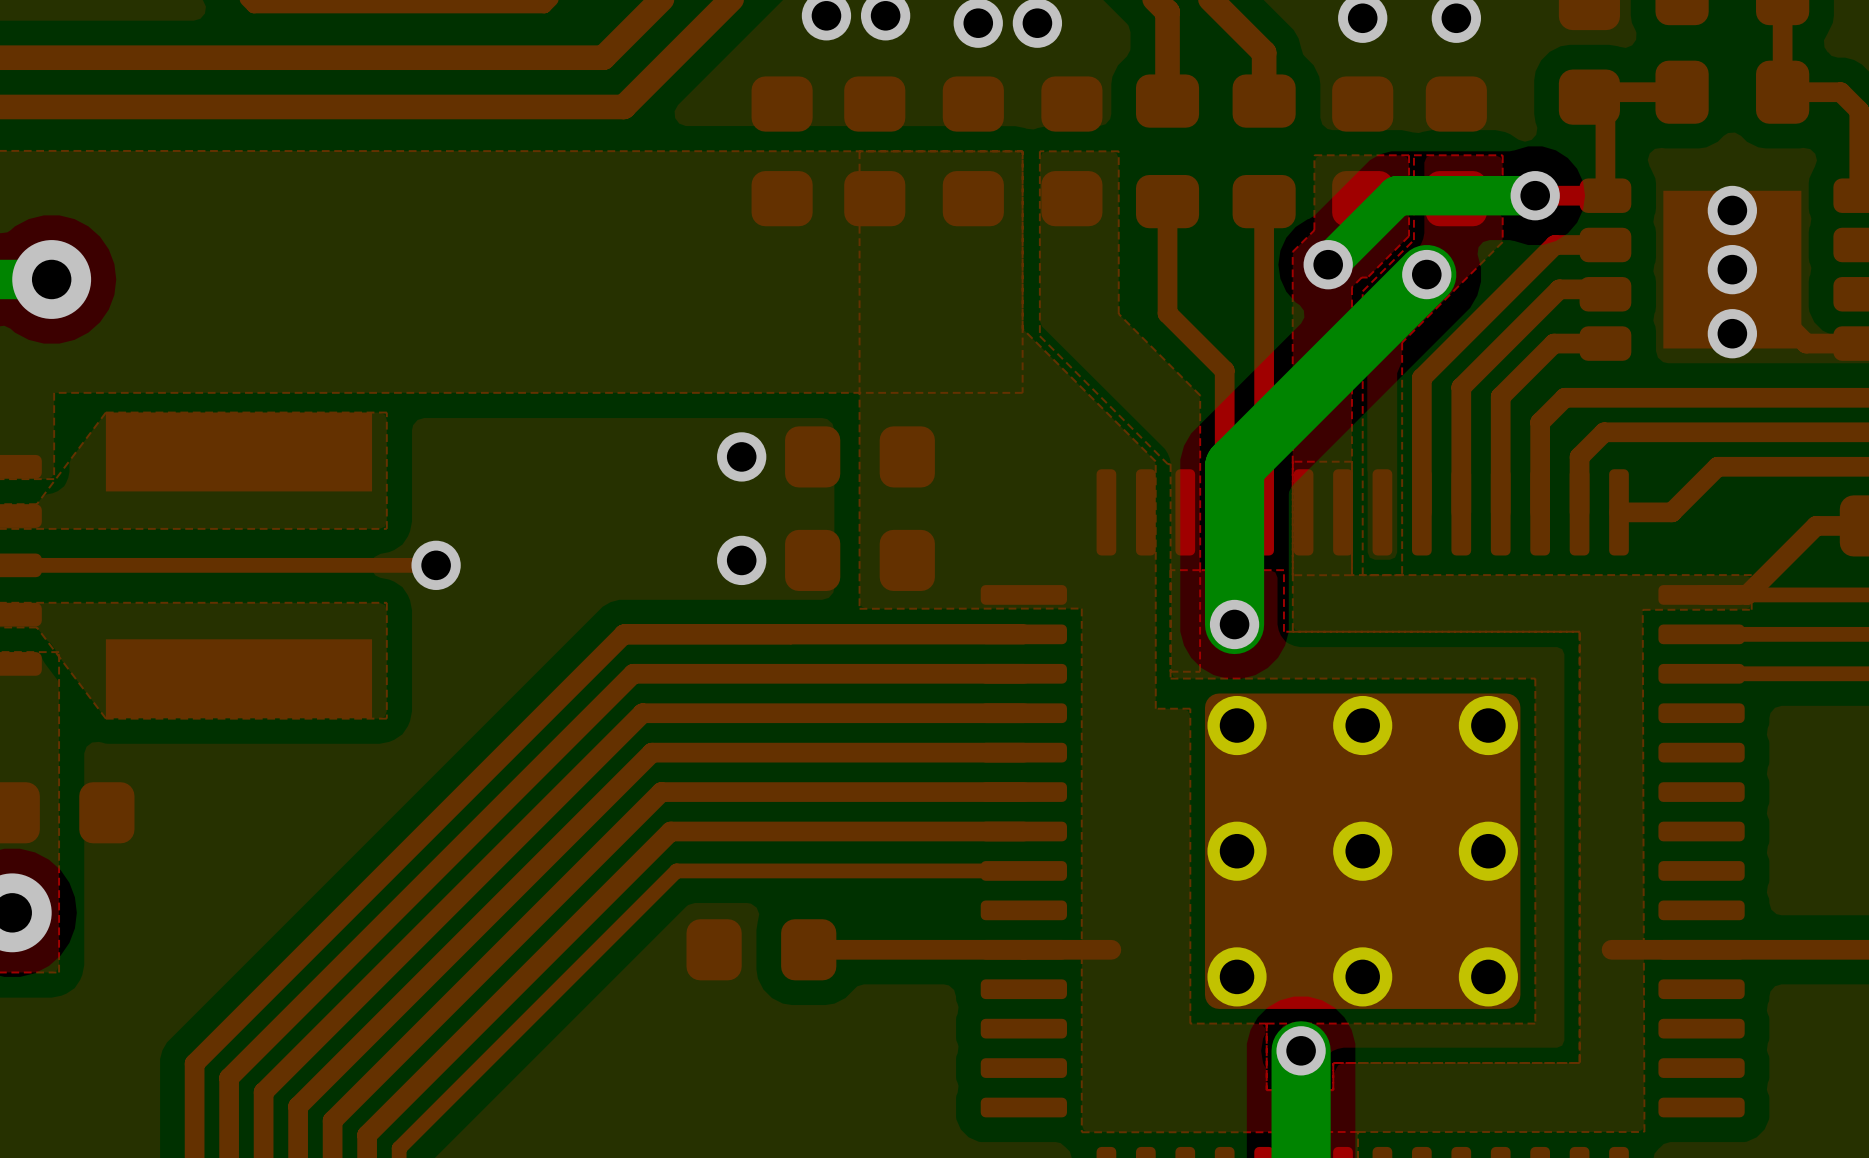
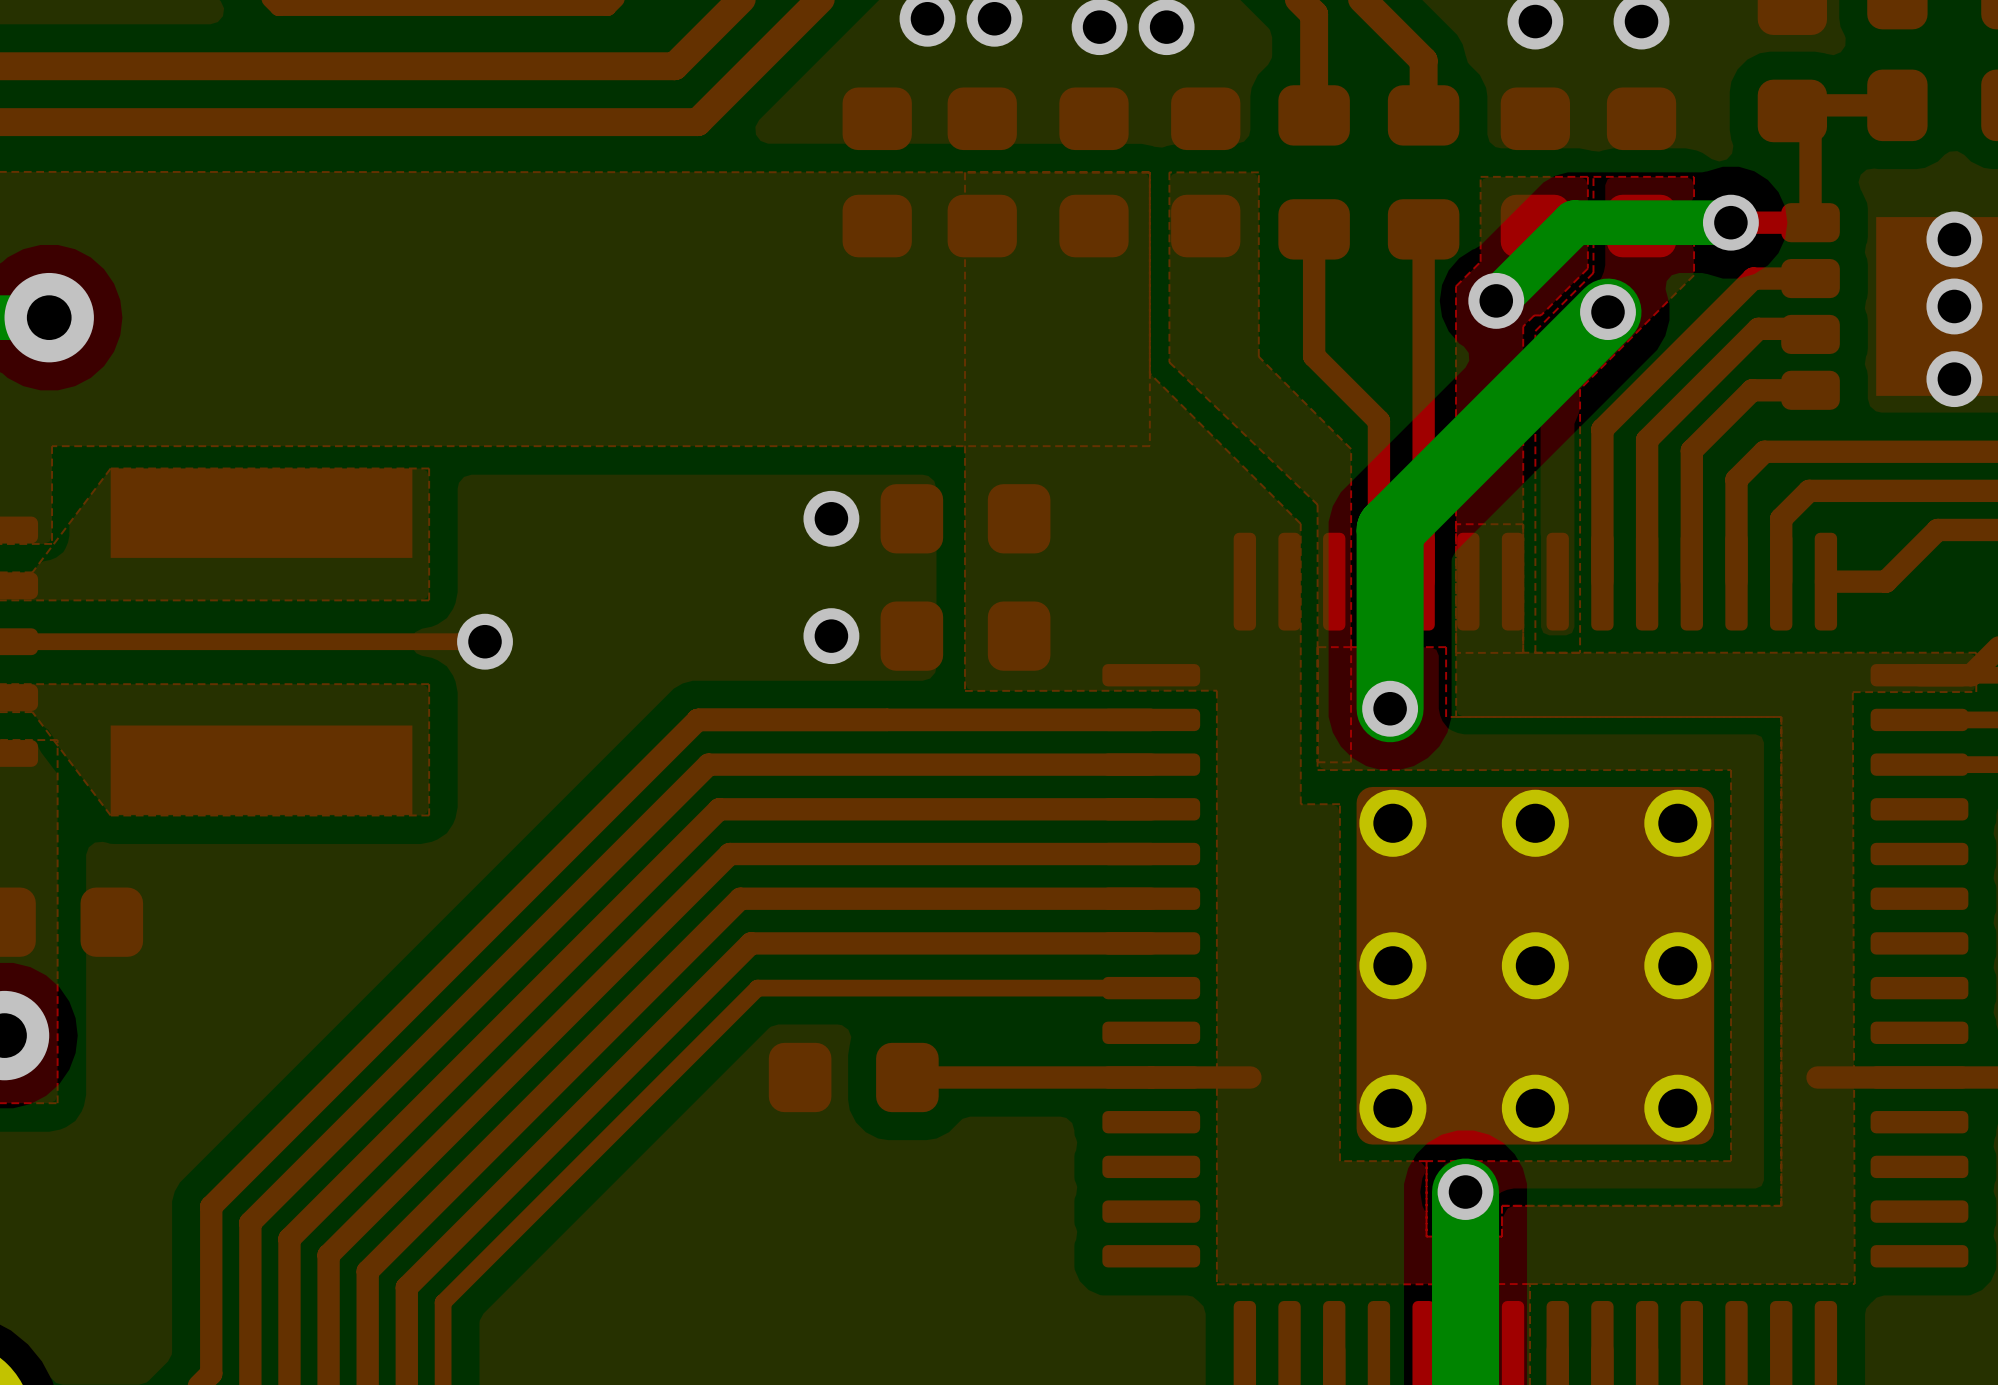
top zone outline: (1039, 318) (1039, 336) (1167, 464) (1170, 464) -> (1169, 362) (1317, 504) (1317, 527)

